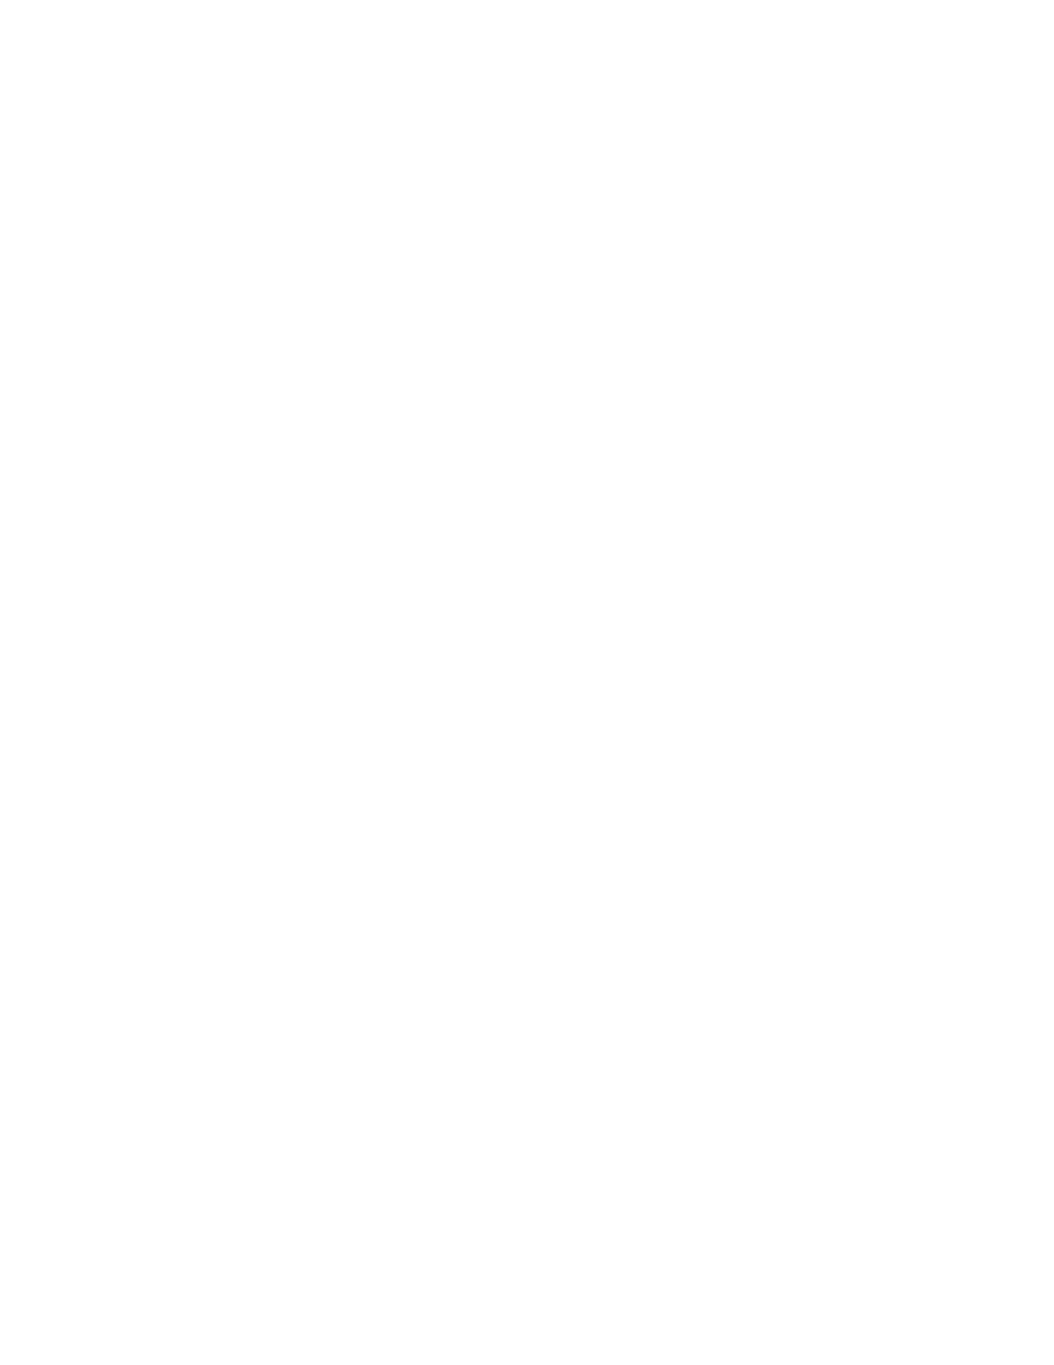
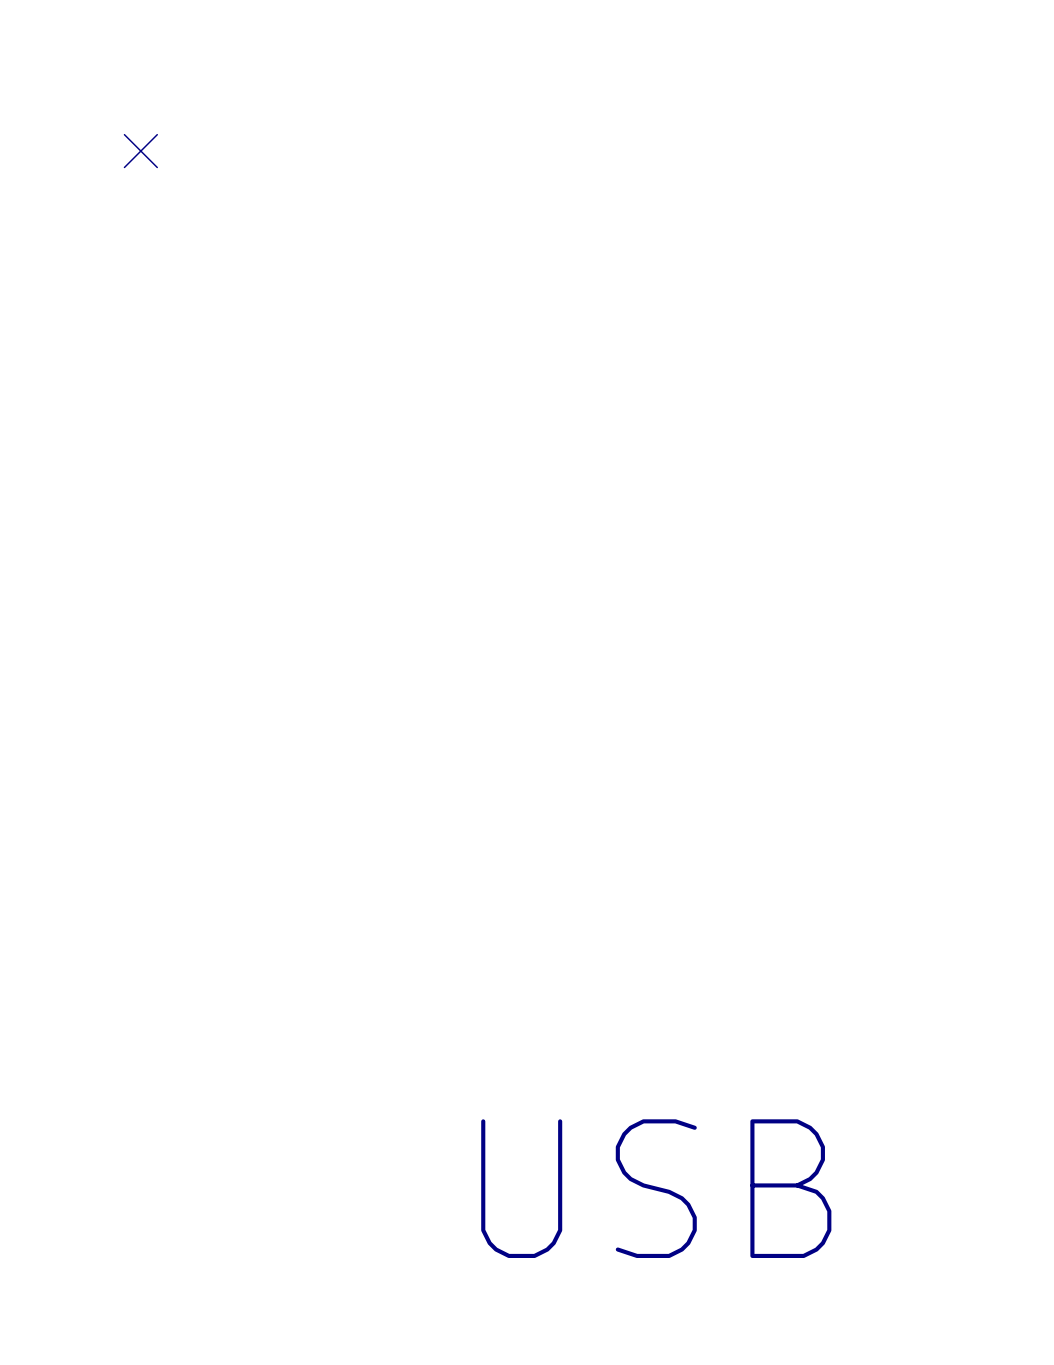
no-connect mark: none -> (140, 151)
text: none -> USB (656, 1188)

